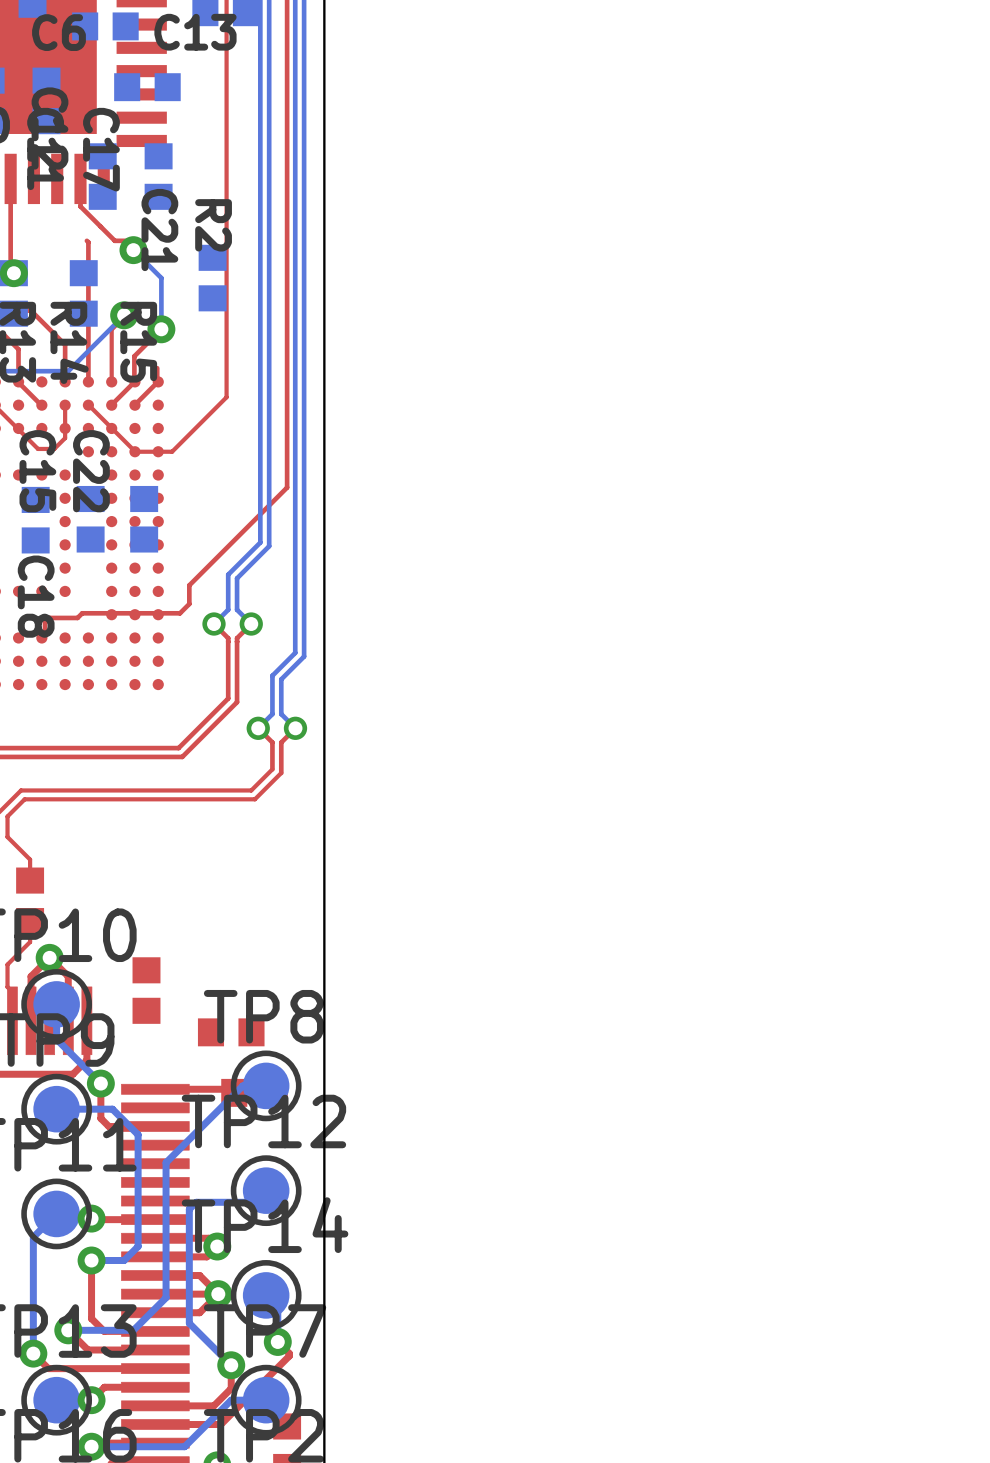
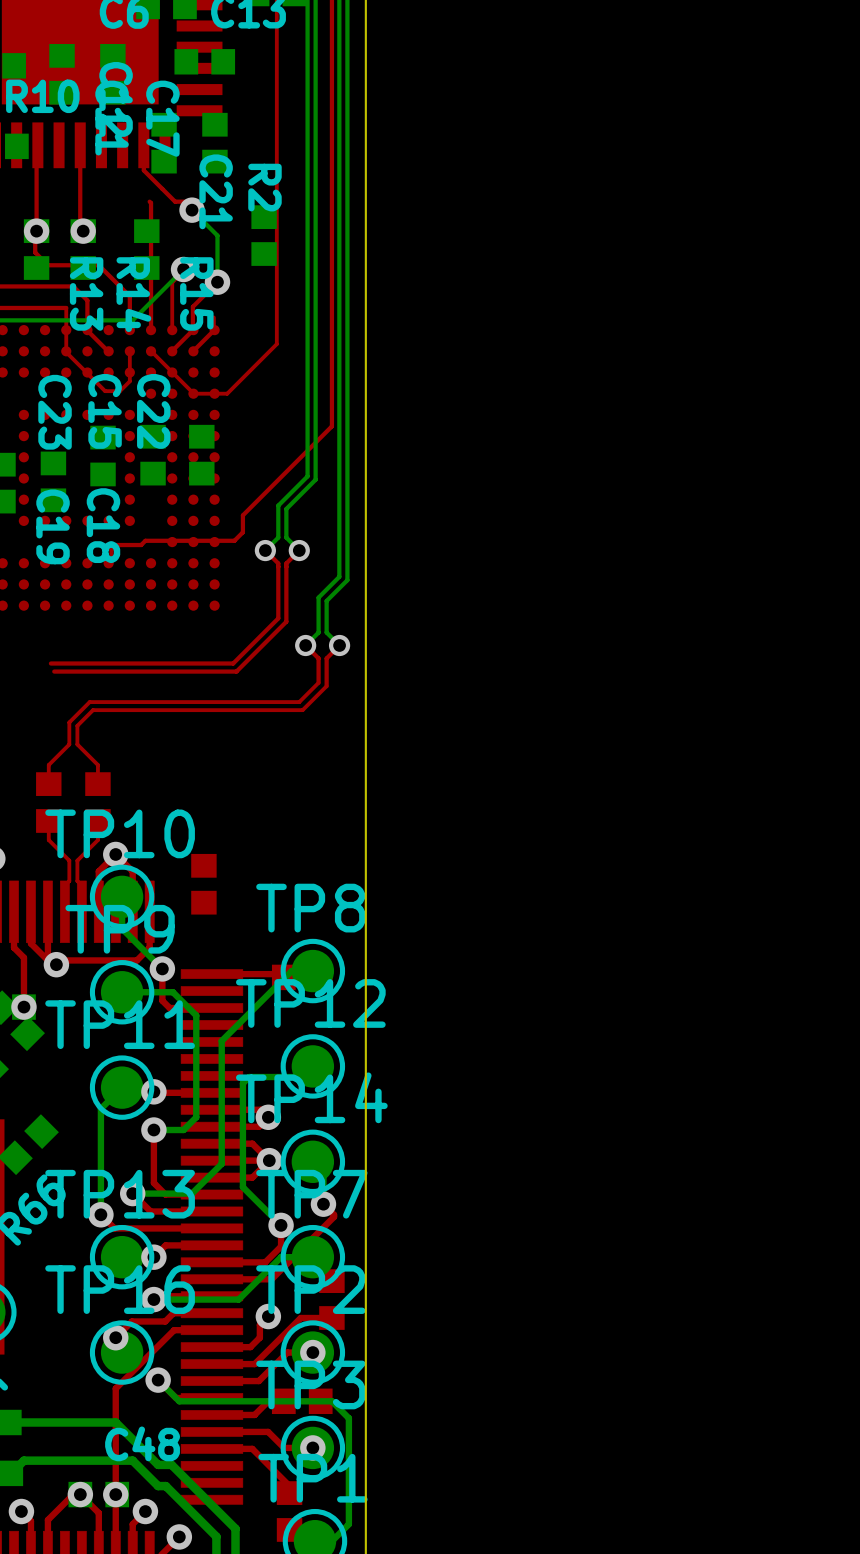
part: (231, 1032) -> none

